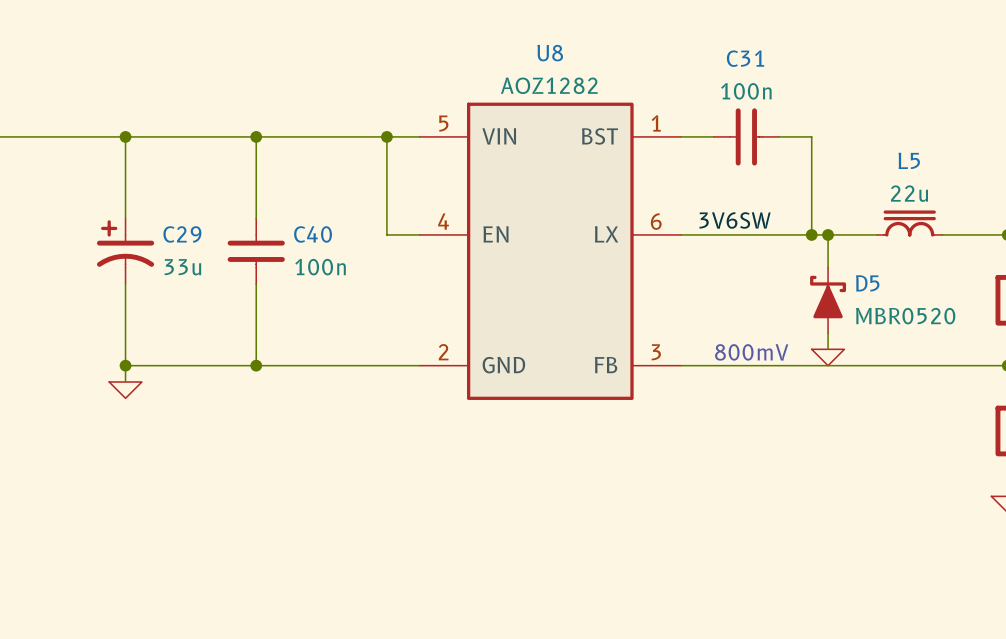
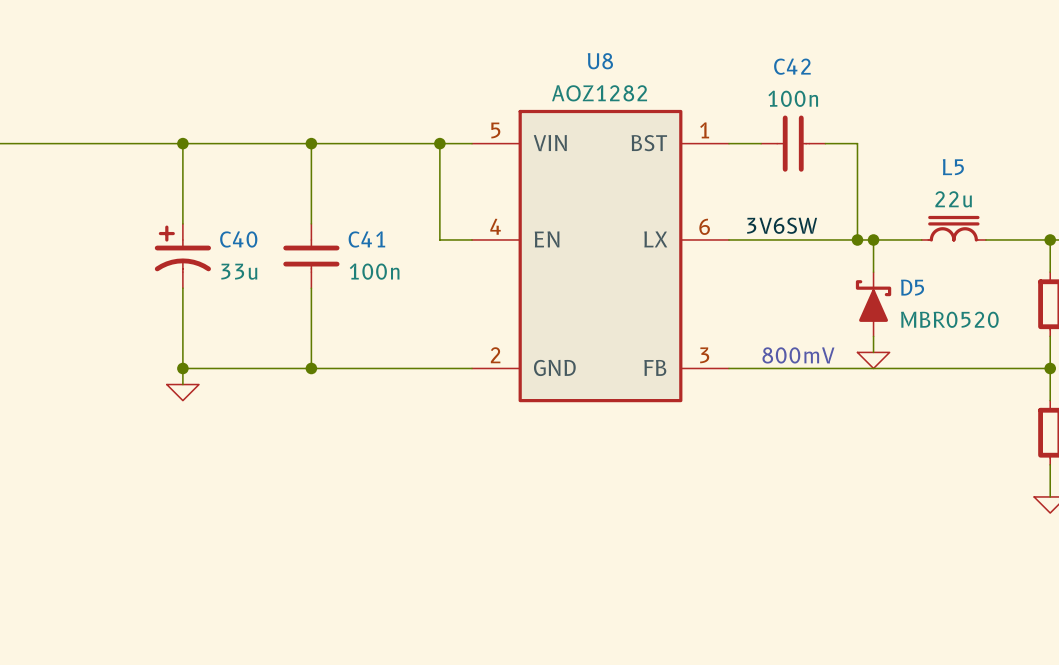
C31 name: C31 (745, 58) -> C42 (792, 66)
C29 name: C29 (182, 234) -> C40 (238, 239)
C40 name: C40 (313, 234) -> C41 (366, 239)

